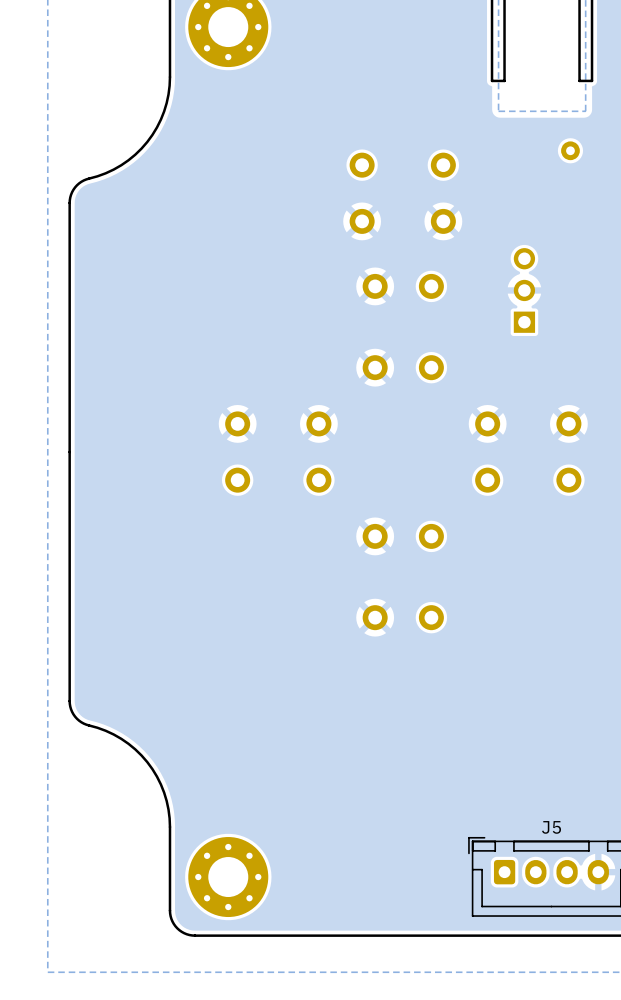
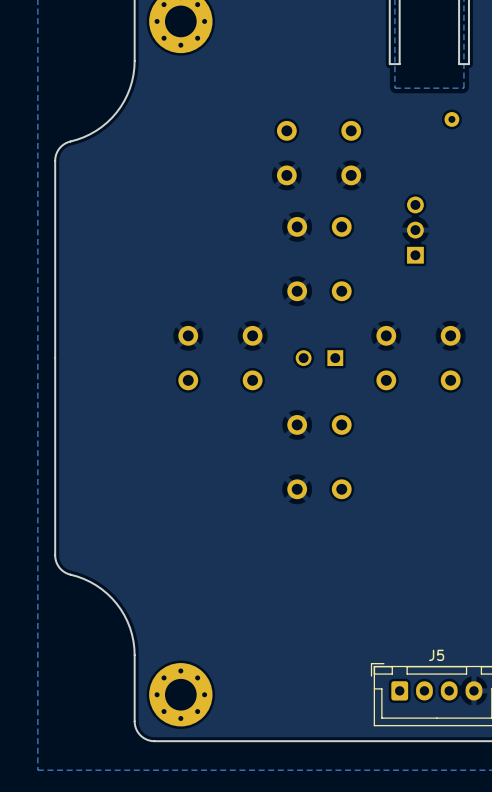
part: none -> (319, 358)

